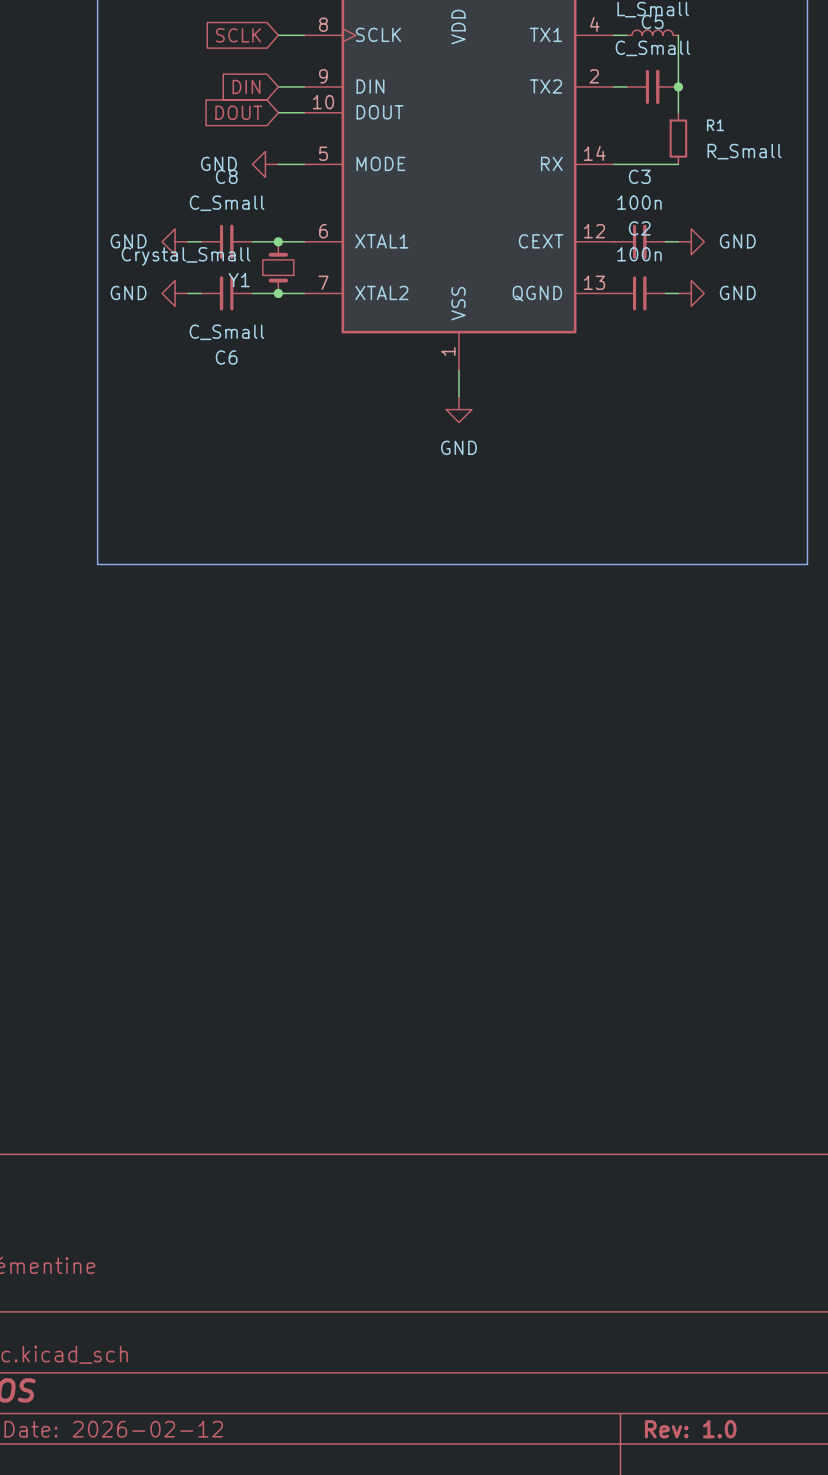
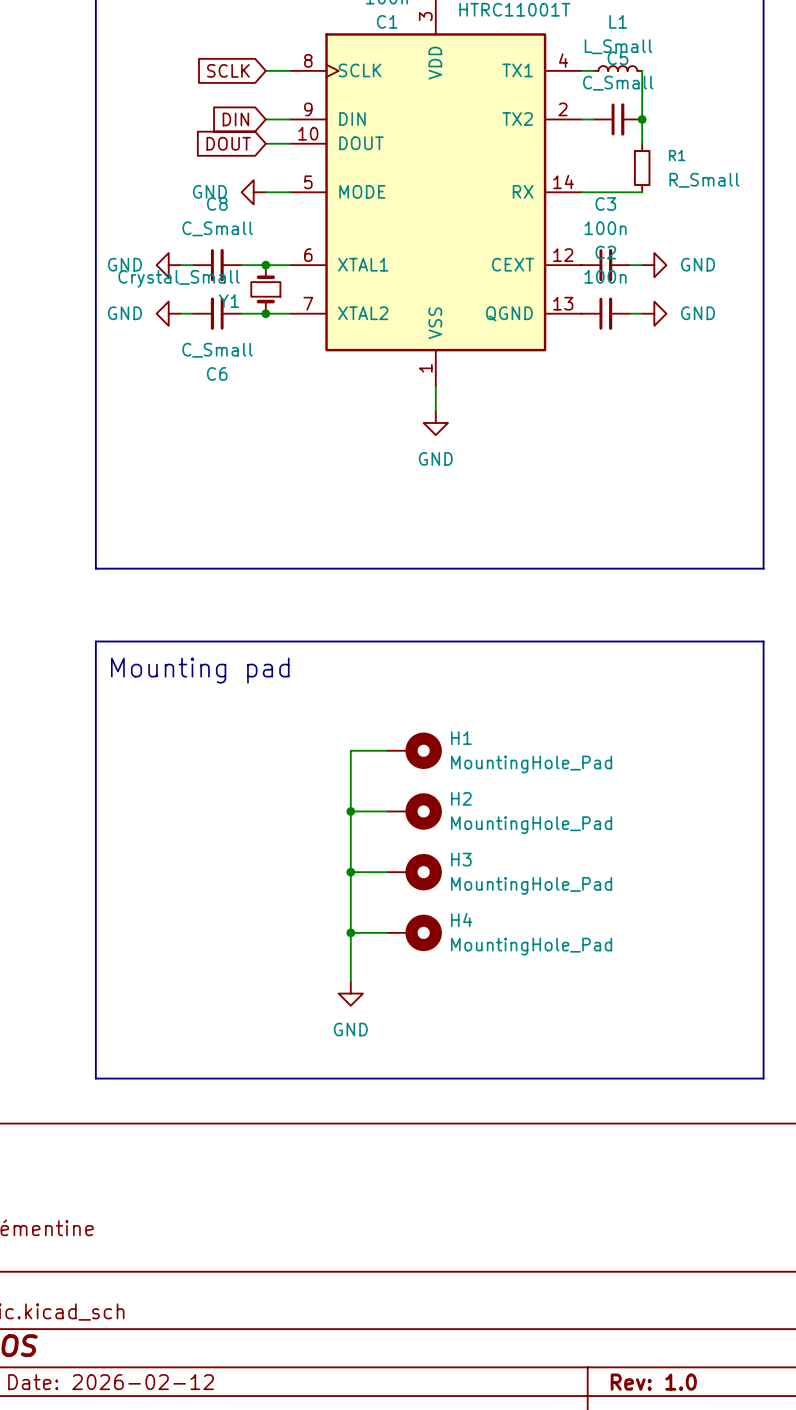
line: none -> (95, 641) (763, 641) (763, 1078) (95, 1078) (95, 641)
text: none -> Mounting pad (200, 670)
wire: none -> (387, 750) (350, 750) (350, 981)
H1: none -> MountingHole_Pad (414, 750)
wire: none -> (350, 811) (387, 811)
junction: none -> (350, 811)
H2: none -> MountingHole_Pad (414, 811)
wire: none -> (350, 872) (387, 872)
junction: none -> (350, 872)
H3: none -> MountingHole_Pad (414, 872)
wire: none -> (350, 932) (387, 932)
junction: none -> (350, 932)
H4: none -> MountingHole_Pad (414, 932)
power symbol: none -> GND (350, 993)

